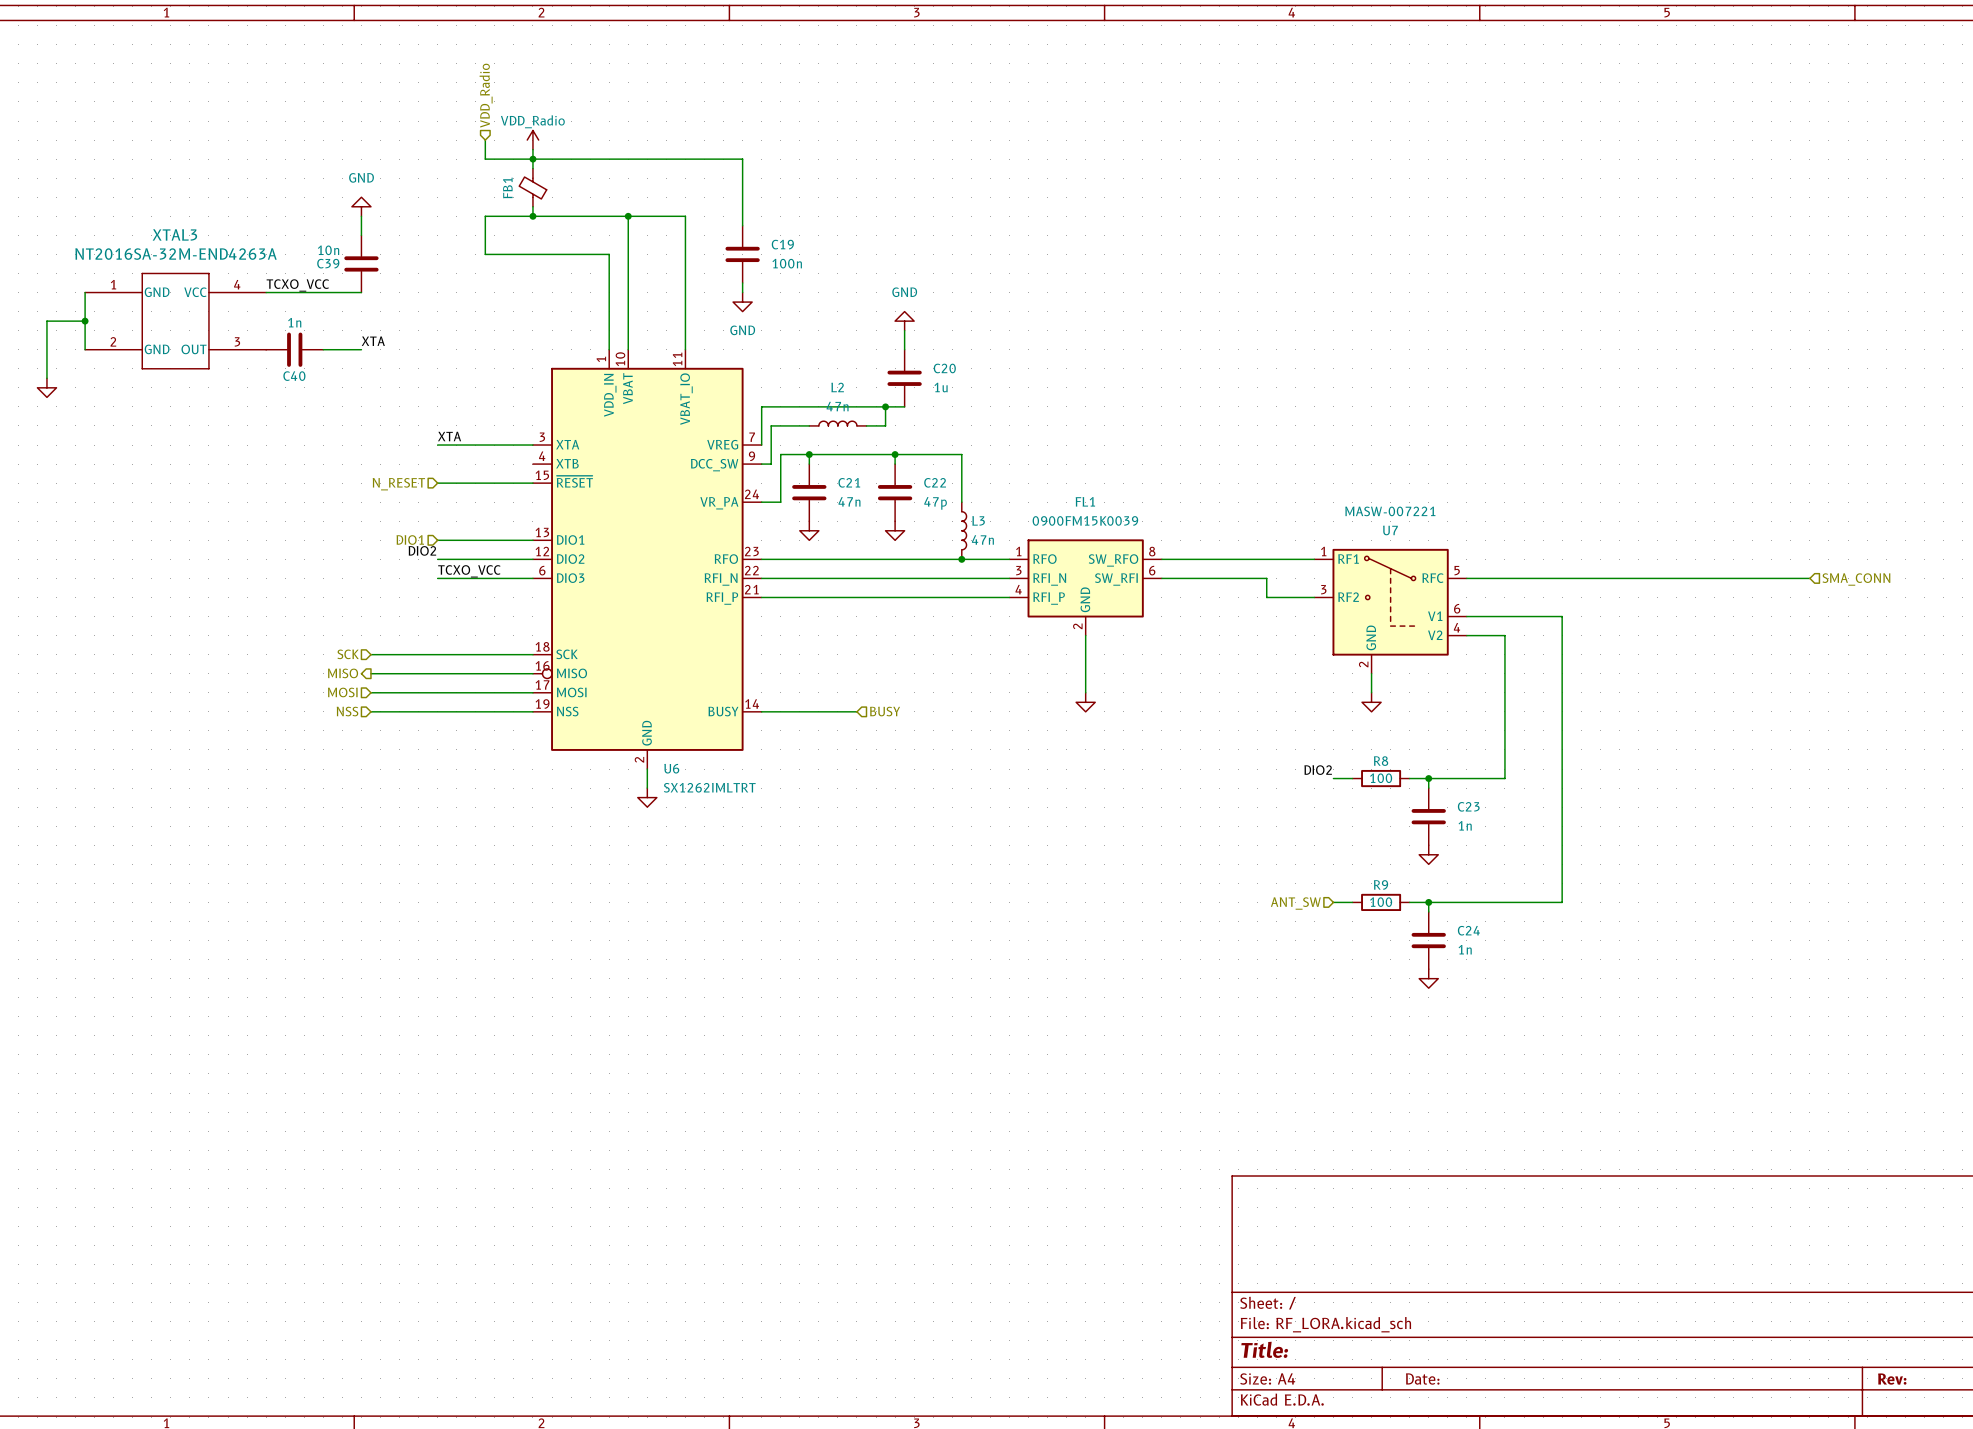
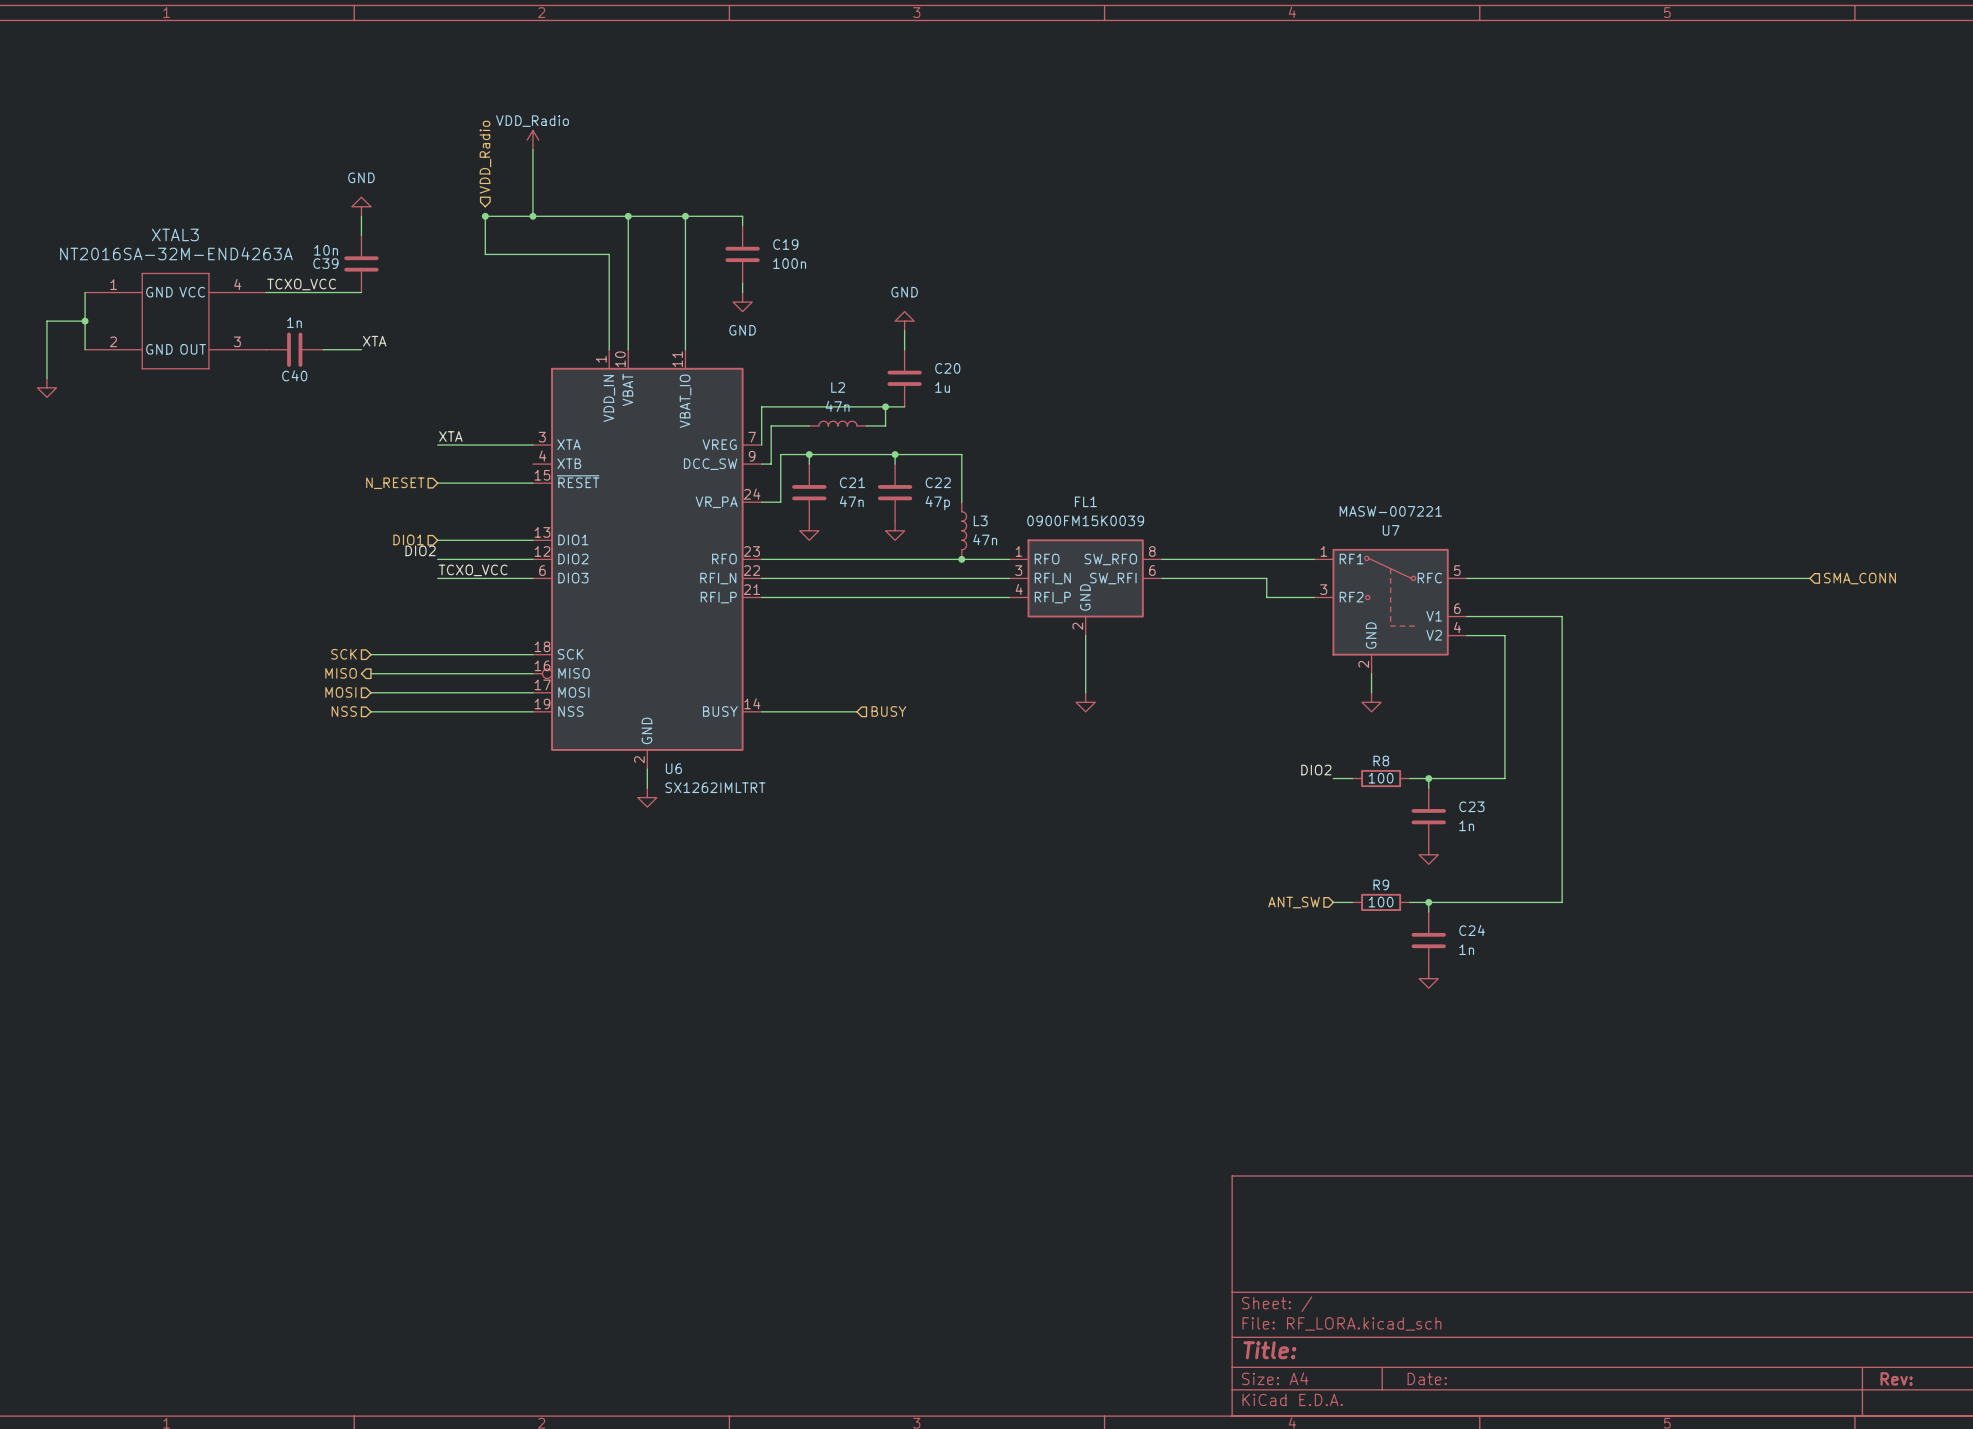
hierarchical label position: VDD_Radio (486, 95) -> VDD_Radio (485, 157)
wire: (485, 140) (485, 159) (742, 159) (742, 216) -> (685, 216) (742, 216)
junction: (532, 159) -> none
FB1: (532, 187) -> none
junction: none -> (485, 216)
junction: none -> (685, 216)

